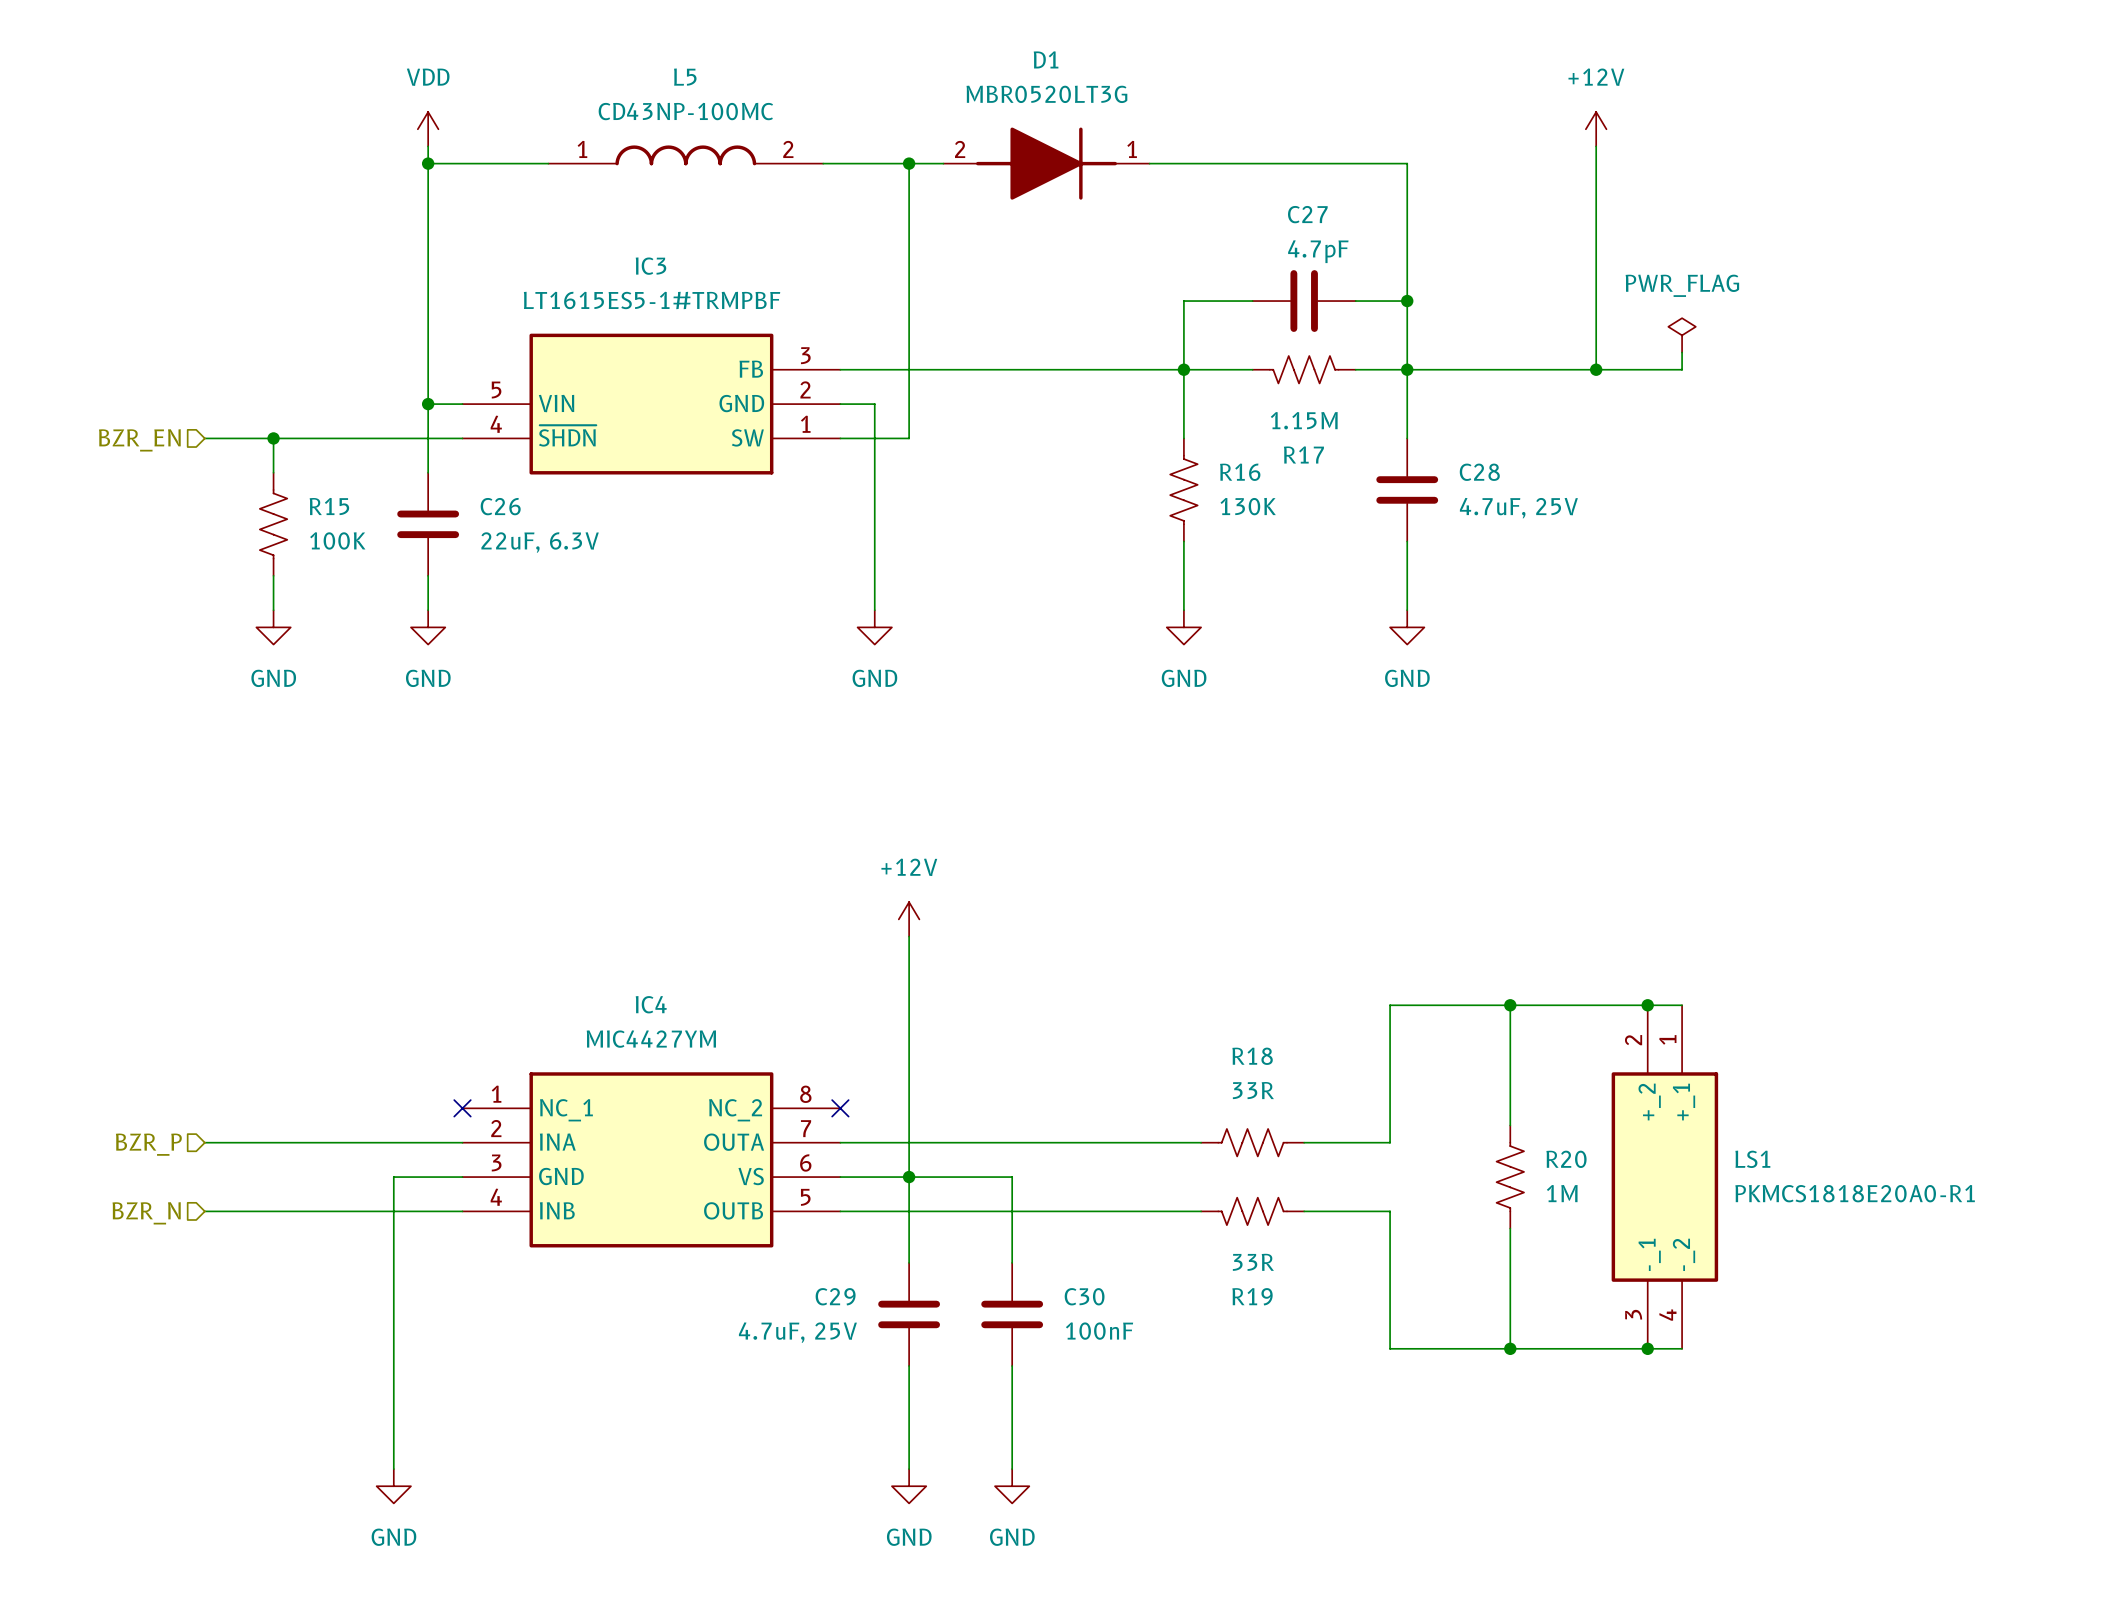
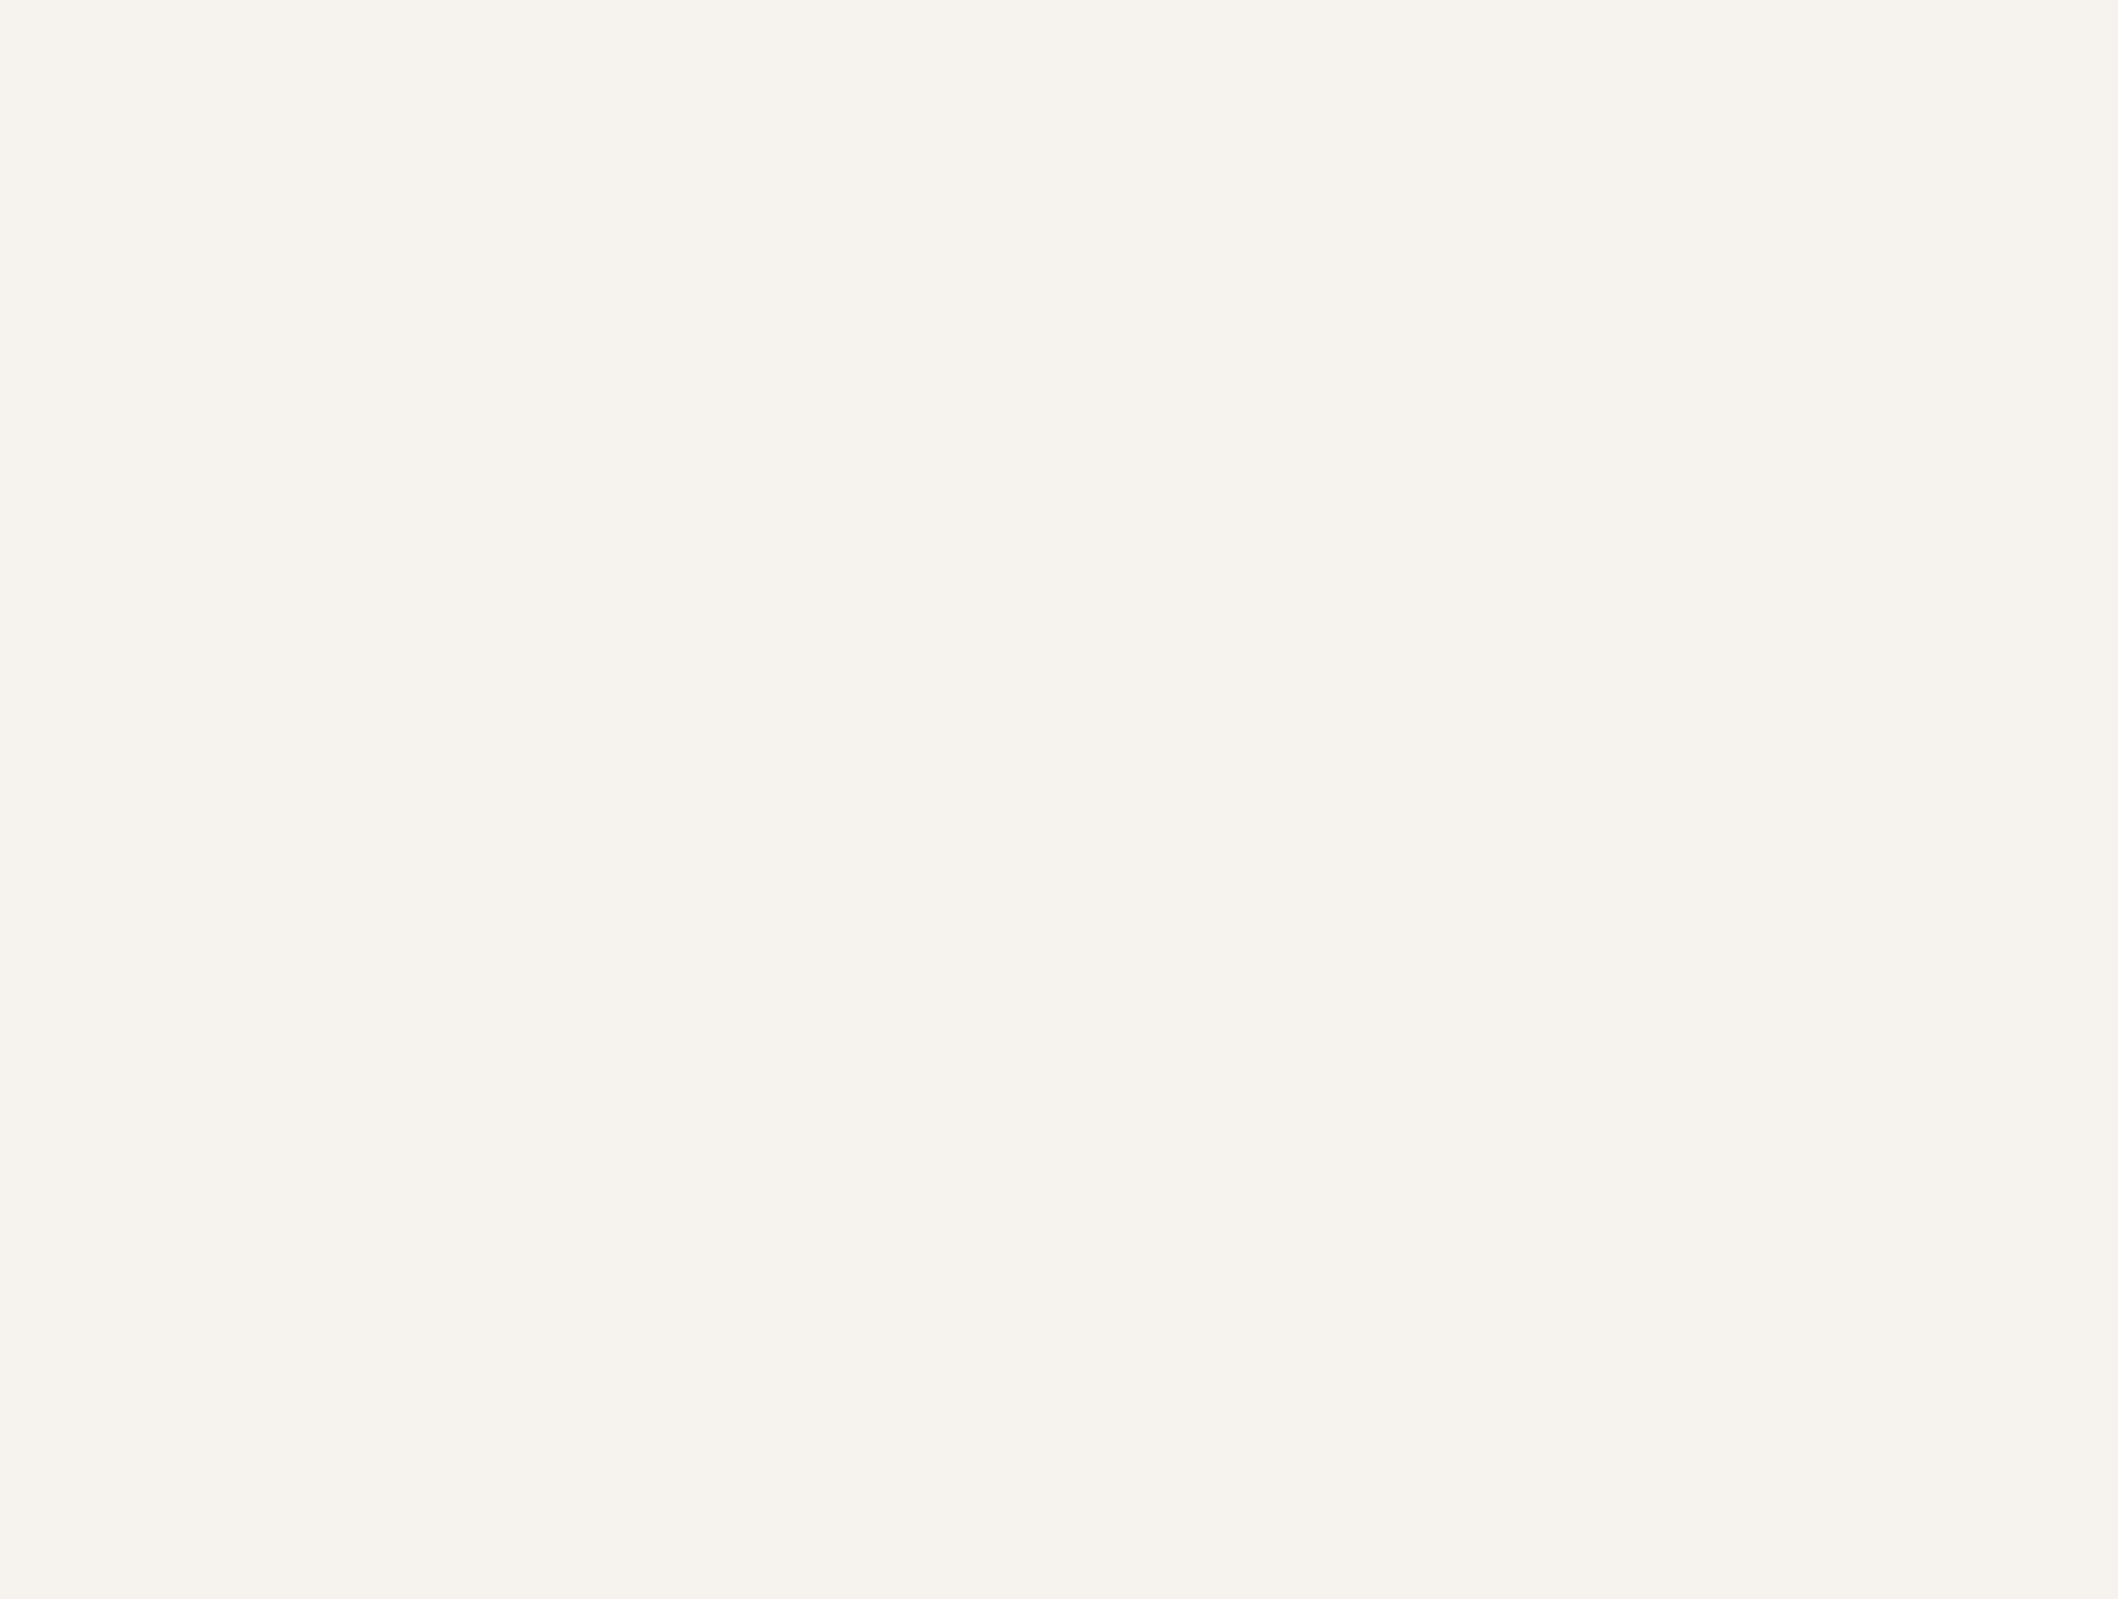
power symbol: VDD (428, 129) -> none
power symbol: +12V (1596, 129) -> none
wire: (428, 146) (428, 472) -> none
wire: (1596, 146) (1596, 369) -> none
L5: CD43NP-100MC (685, 155) -> none
wire: (428, 163) (548, 163) -> none
junction: (428, 163) -> none
wire: (823, 163) (943, 163) -> none
wire: (909, 163) (909, 438) (840, 438) -> none
junction: (909, 163) -> none
D1: MBR0520LT3G (1046, 163) -> none
wire: (1149, 163) (1407, 163) (1407, 438) -> none
wire: (1252, 301) (1183, 301) (1183, 438) -> none
C27: 4.7pF (1304, 301) -> none
wire: (1355, 301) (1407, 301) -> none
junction: (1407, 301) -> none
power symbol: PWR_FLAG (1682, 335) -> none
wire: (1682, 352) (1682, 369) (1355, 369) -> none
wire: (840, 369) (1252, 369) -> none
junction: (1183, 369) -> none
R17: 1.15M (1304, 369) -> none
junction: (1407, 369) -> none
junction: (1596, 369) -> none
wire: (428, 404) (462, 404) -> none
junction: (428, 404) -> none
IC3: LT1615ES5-1#TRMPBF (651, 404) -> none
wire: (840, 404) (874, 404) (874, 610) -> none
wire: (204, 438) (462, 438) -> none
wire: (273, 438) (273, 472) -> none
junction: (273, 438) -> none
hierarchical label: BZR_EN (139, 440) -> none
R16: 130K (1183, 489) -> none
C28: 4.7uF, 25V (1407, 489) -> none
R15: 100K (273, 524) -> none
C26: 22uF, 6.3V (428, 524) -> none
wire: (1183, 541) (1183, 610) -> none
wire: (1407, 541) (1407, 610) -> none
wire: (273, 575) (273, 610) -> none
wire: (428, 575) (428, 610) -> none
power symbol: GND (273, 627) -> none
power symbol: GND (428, 627) -> none
power symbol: GND (874, 627) -> none
power symbol: GND (1183, 627) -> none
power symbol: GND (1407, 627) -> none
power symbol: +12V (909, 919) -> none
wire: (909, 936) (909, 1262) -> none
wire: (1510, 1005) (1510, 1125) -> none
junction: (1510, 1005) -> none
junction: (1647, 1005) -> none
wire: (1682, 1005) (1390, 1005) (1390, 1142) (1304, 1142) -> none
no-connect mark: (462, 1108) -> none
no-connect mark: (840, 1108) -> none
wire: (204, 1142) (462, 1142) -> none
wire: (840, 1142) (1201, 1142) -> none
R18: 33R (1252, 1142) -> none
hierarchical label: BZR_P (148, 1144) -> none
IC4: MIC4427YM (651, 1159) -> none
wire: (462, 1177) (393, 1177) (393, 1469) -> none
wire: (840, 1177) (1012, 1177) (1012, 1262) -> none
junction: (909, 1177) -> none
R20: 1M (1510, 1177) -> none
LS1: PKMCS1818E20A0-R1 (1664, 1177) -> none
wire: (204, 1211) (462, 1211) -> none
wire: (840, 1211) (1201, 1211) -> none
R19: 33R (1252, 1211) -> none
wire: (1304, 1211) (1390, 1211) (1390, 1348) (1682, 1348) -> none
hierarchical label: BZR_N (146, 1213) -> none
wire: (1510, 1228) (1510, 1348) -> none
C29: 4.7uF, 25V (909, 1314) -> none
C30: 100nF (1012, 1314) -> none
junction: (1510, 1348) -> none
junction: (1647, 1348) -> none
wire: (909, 1365) (909, 1469) -> none
wire: (1012, 1365) (1012, 1469) -> none
power symbol: GND (393, 1486) -> none
power symbol: GND (909, 1486) -> none
power symbol: GND (1012, 1486) -> none

